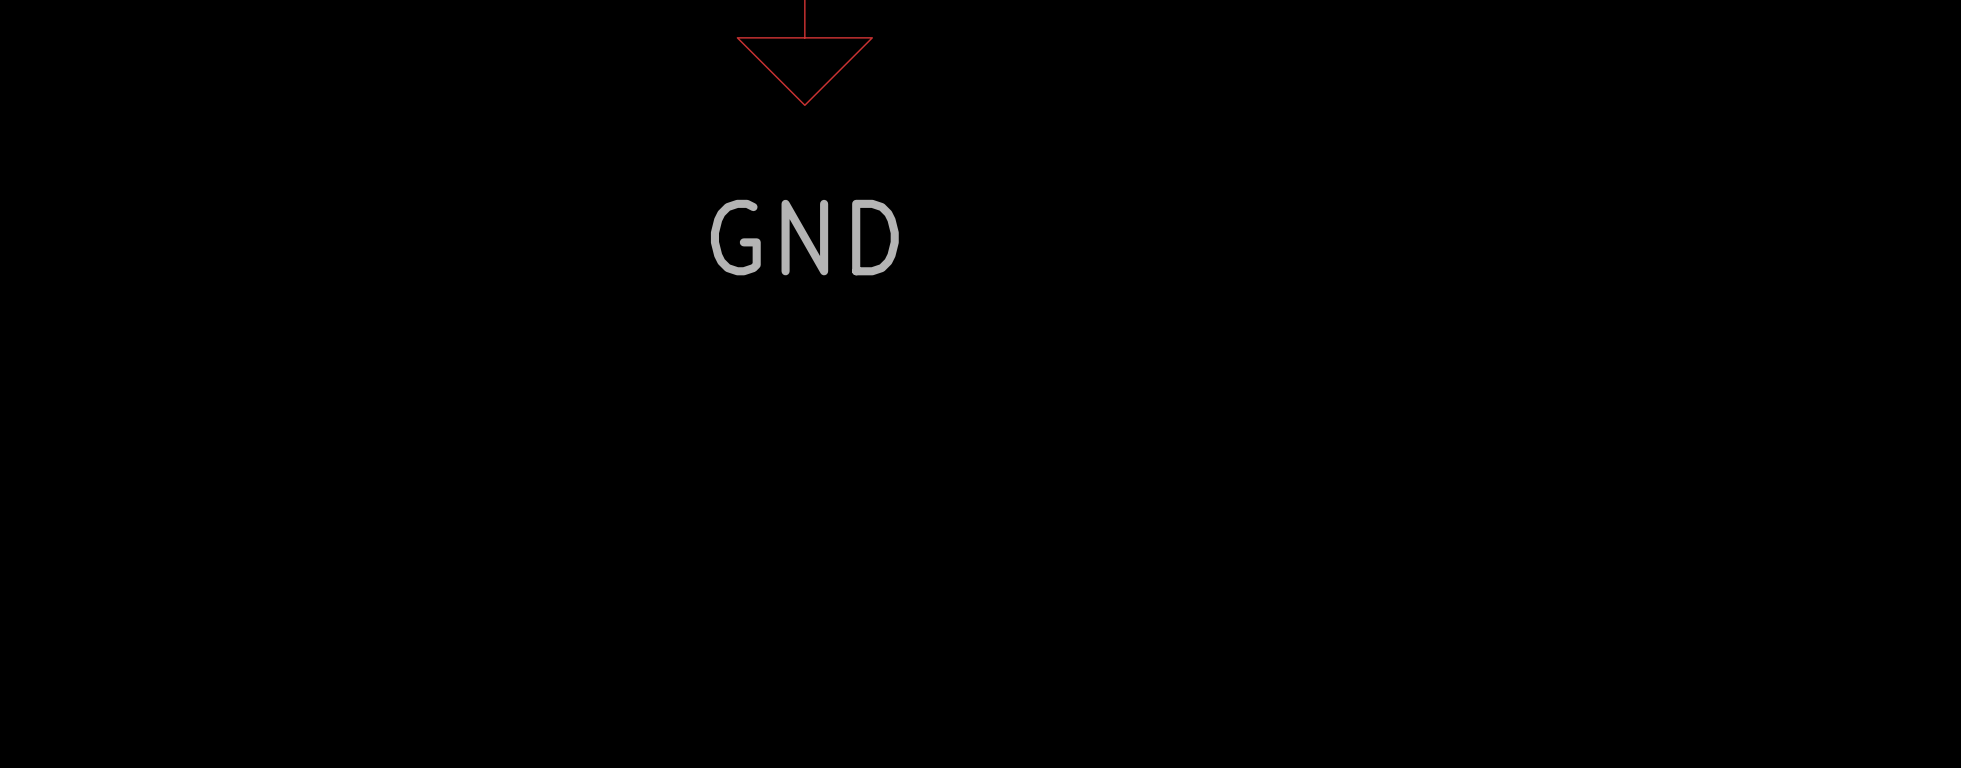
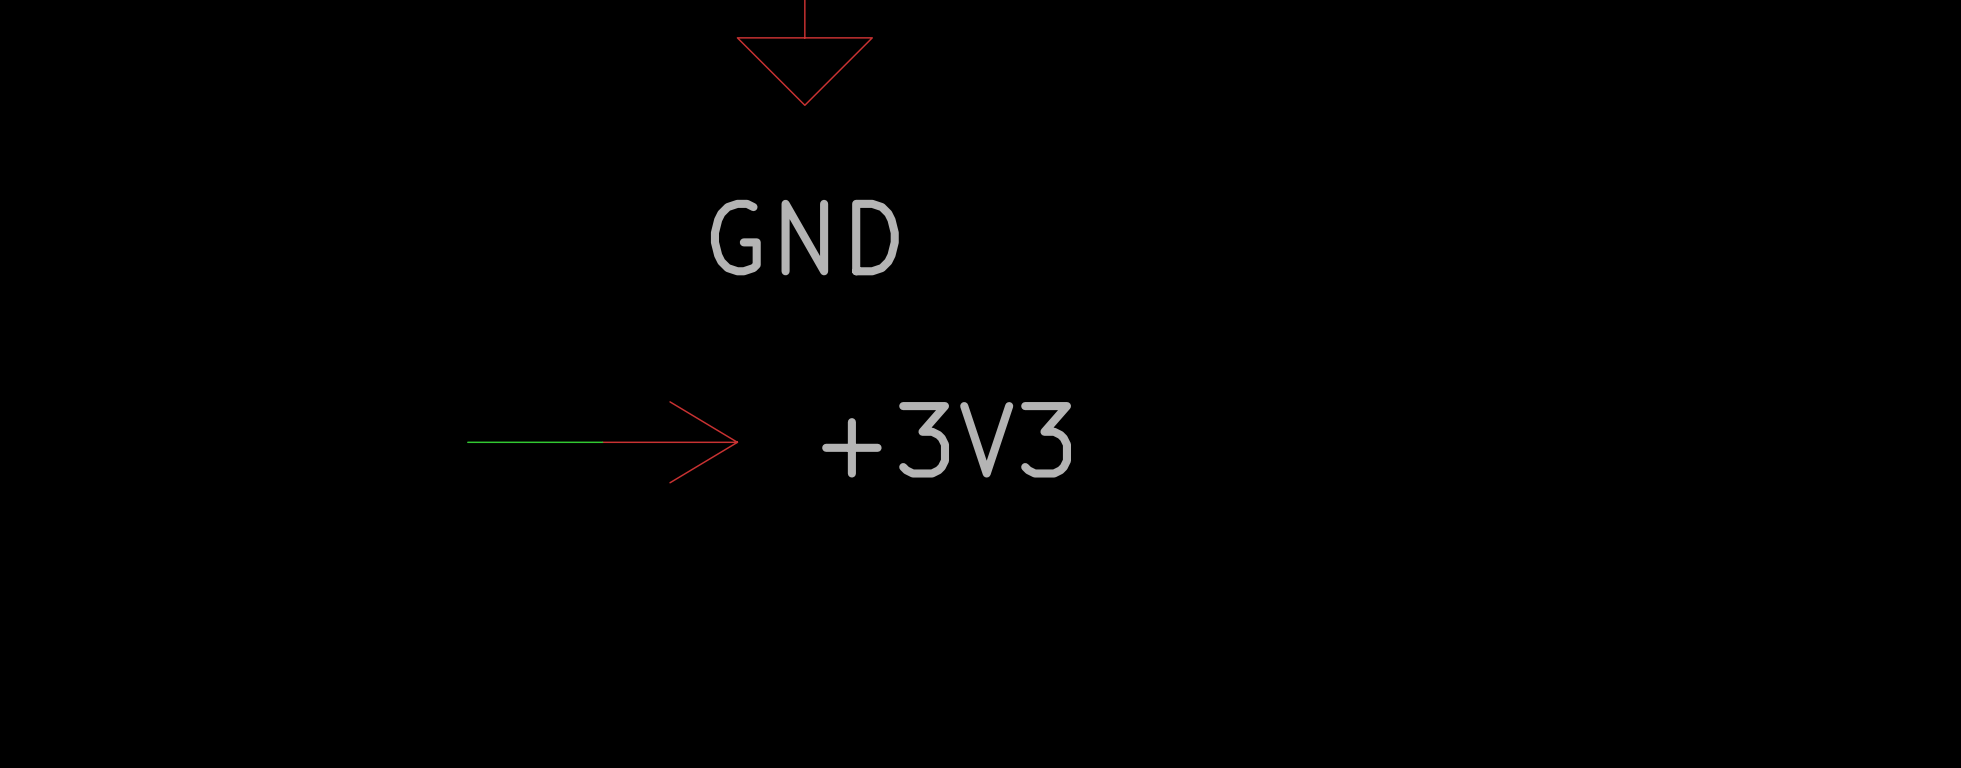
wire: none -> (467, 442) (602, 442)
power symbol: none -> +3V3 (670, 442)

